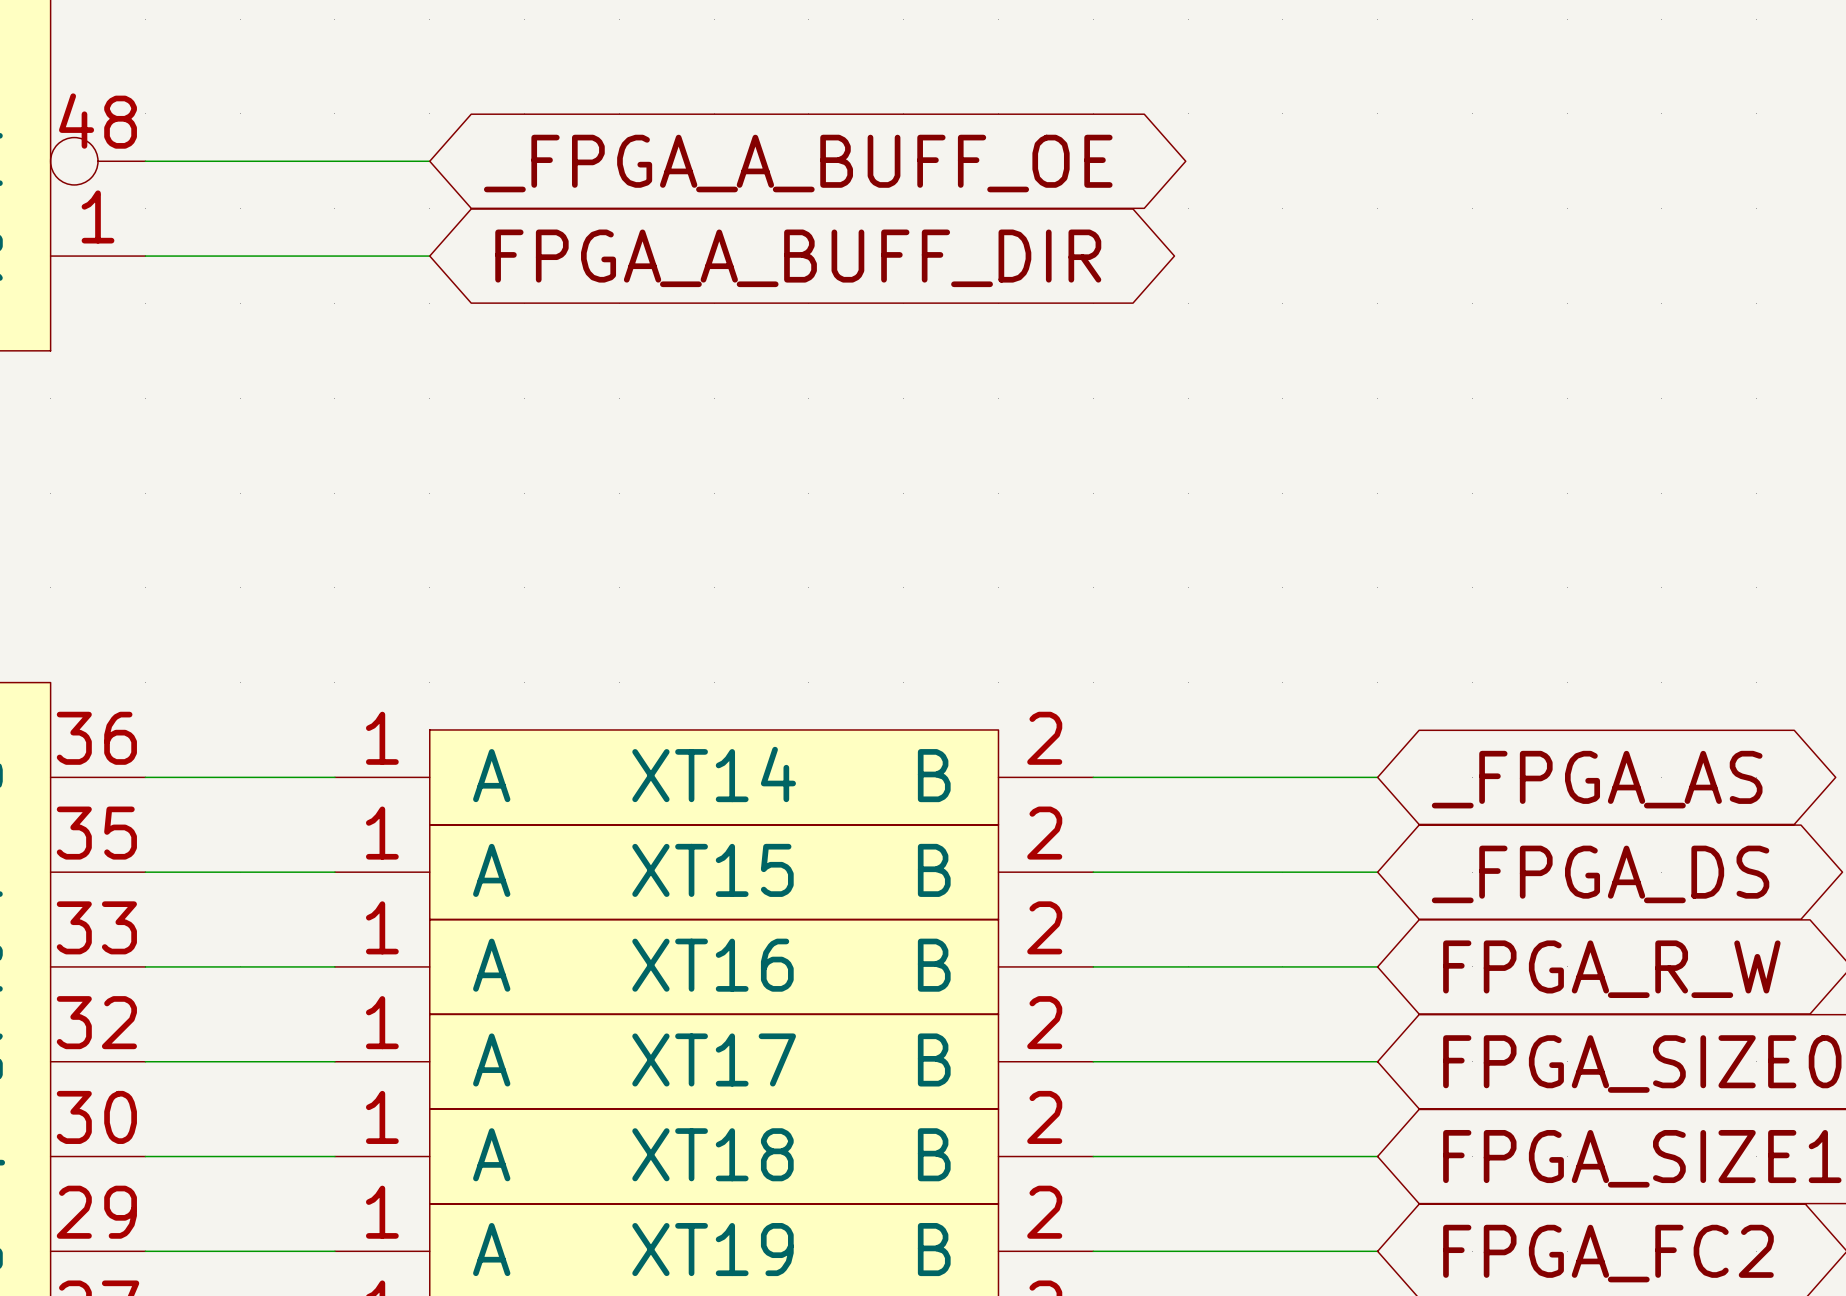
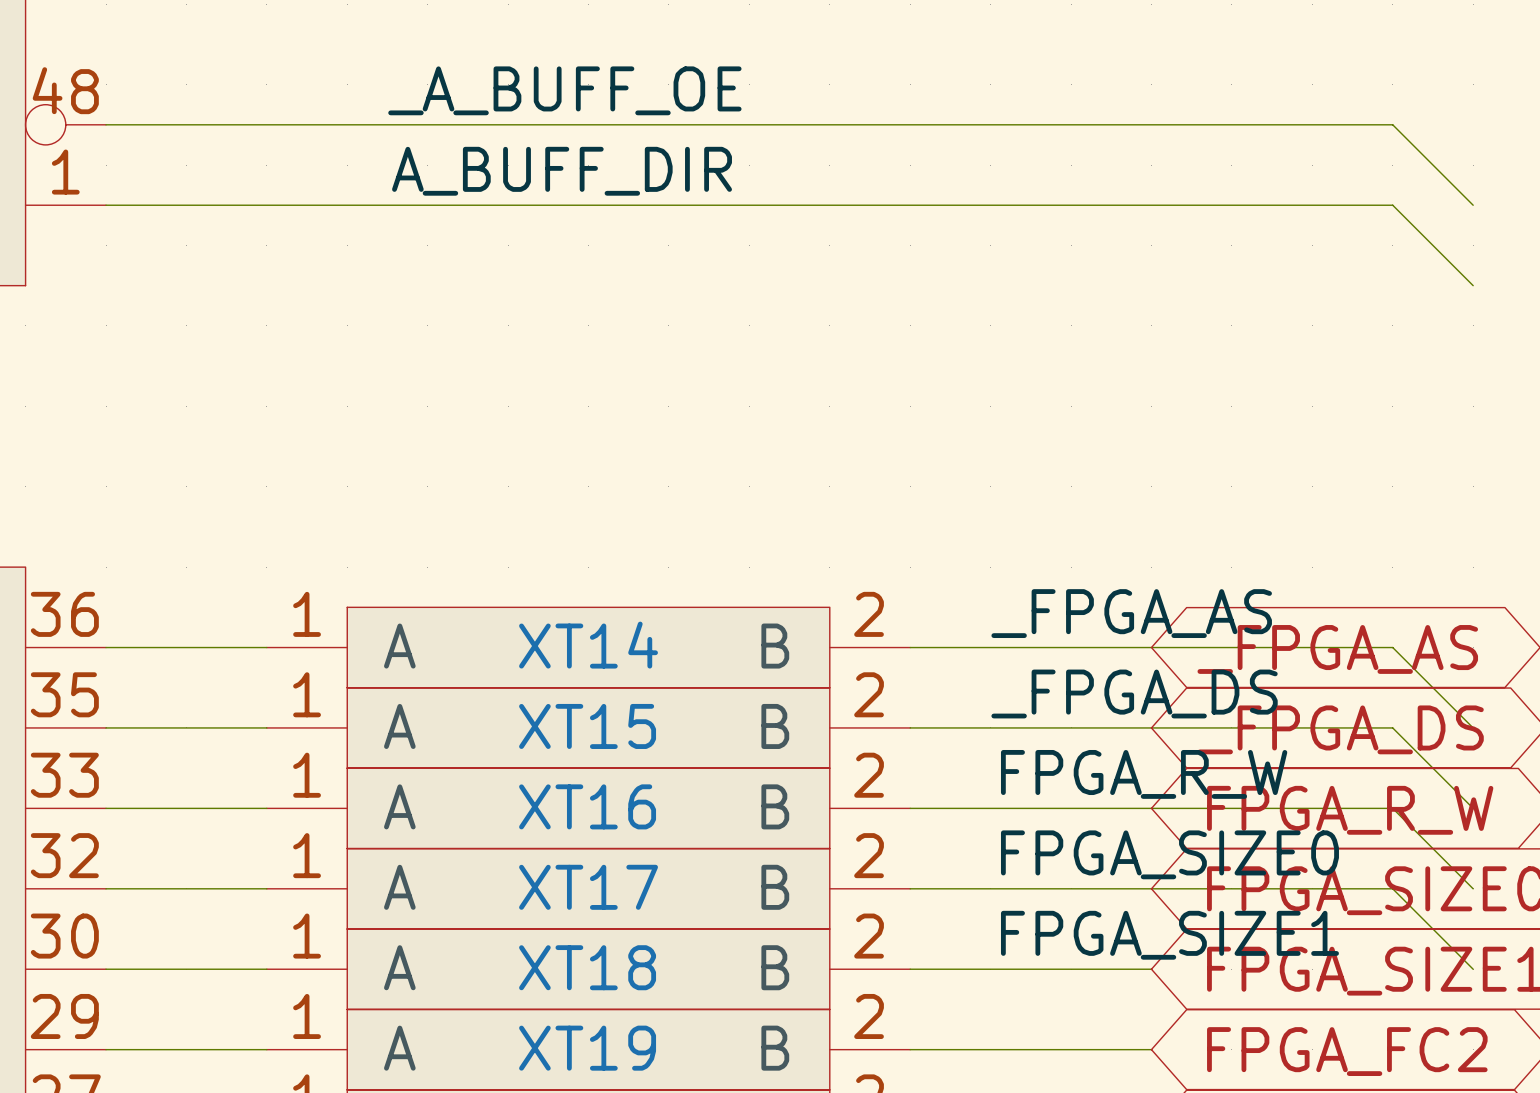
label: none -> _A_BUFF_OE (564, 90)
wire: none -> (347, 124) (1392, 124) (1473, 205)
global label: _FPGA_A_BUFF_OE (798, 163) -> none
label: none -> A_BUFF_DIR (562, 171)
wire: none -> (347, 205) (1392, 205) (1473, 285)
global label: FPGA_A_BUFF_DIR (798, 258) -> none
label: none -> _FPGA_AS (1131, 613)
wire: none -> (1151, 647) (1392, 647) (1473, 727)
label: none -> _FPGA_DS (1134, 694)
wire: none -> (1151, 727) (1392, 727) (1473, 808)
label: none -> FPGA_R_W (1144, 774)
wire: none -> (1151, 808) (1392, 808) (1473, 888)
label: none -> FPGA_SIZE0 (1169, 854)
wire: none -> (1151, 888) (1392, 888) (1473, 969)
label: none -> FPGA_SIZE1 (1169, 935)

